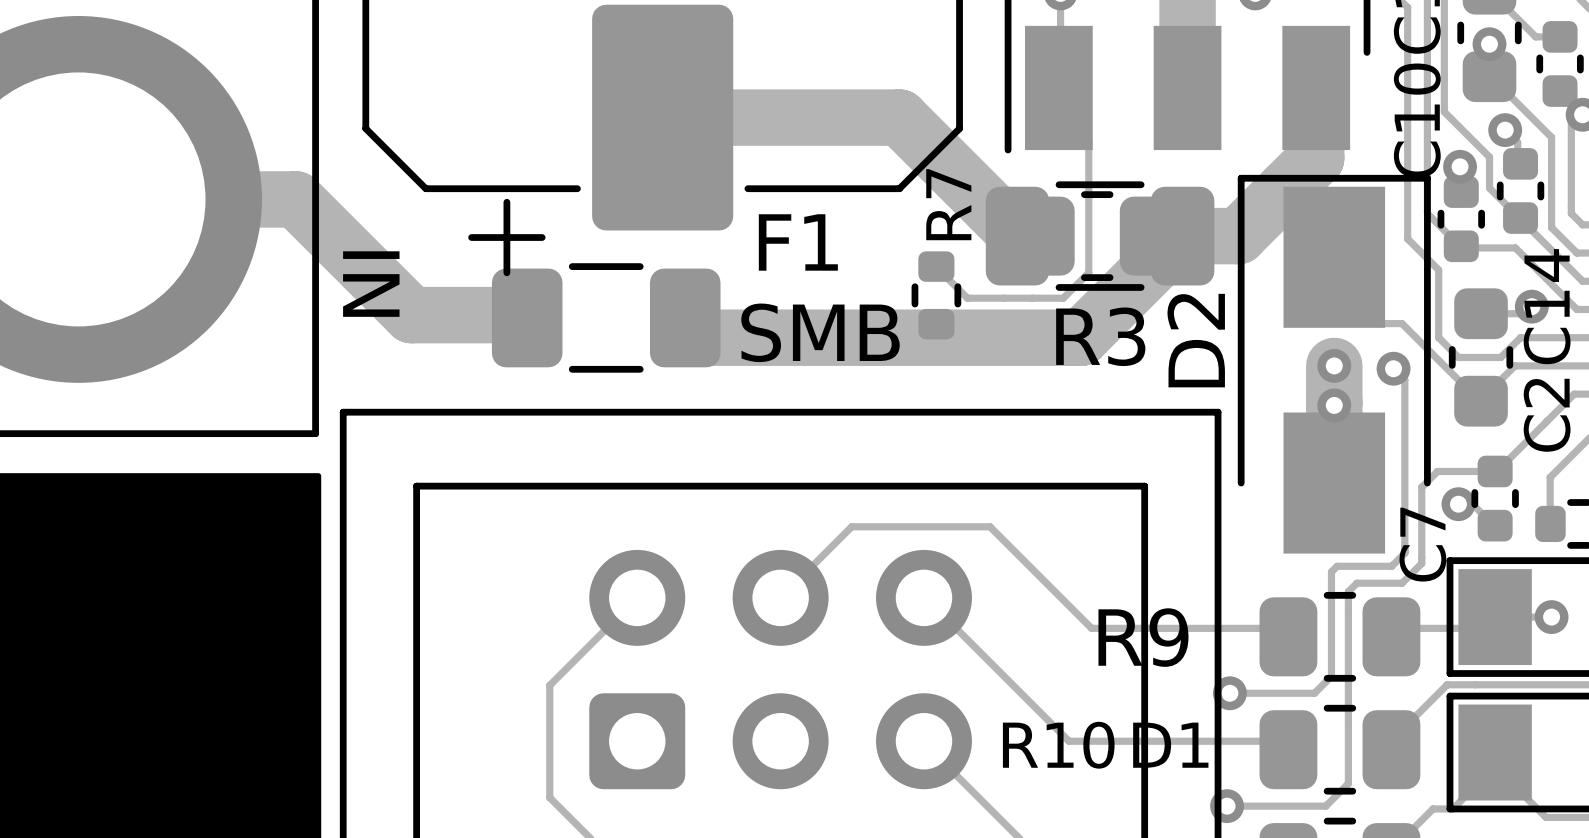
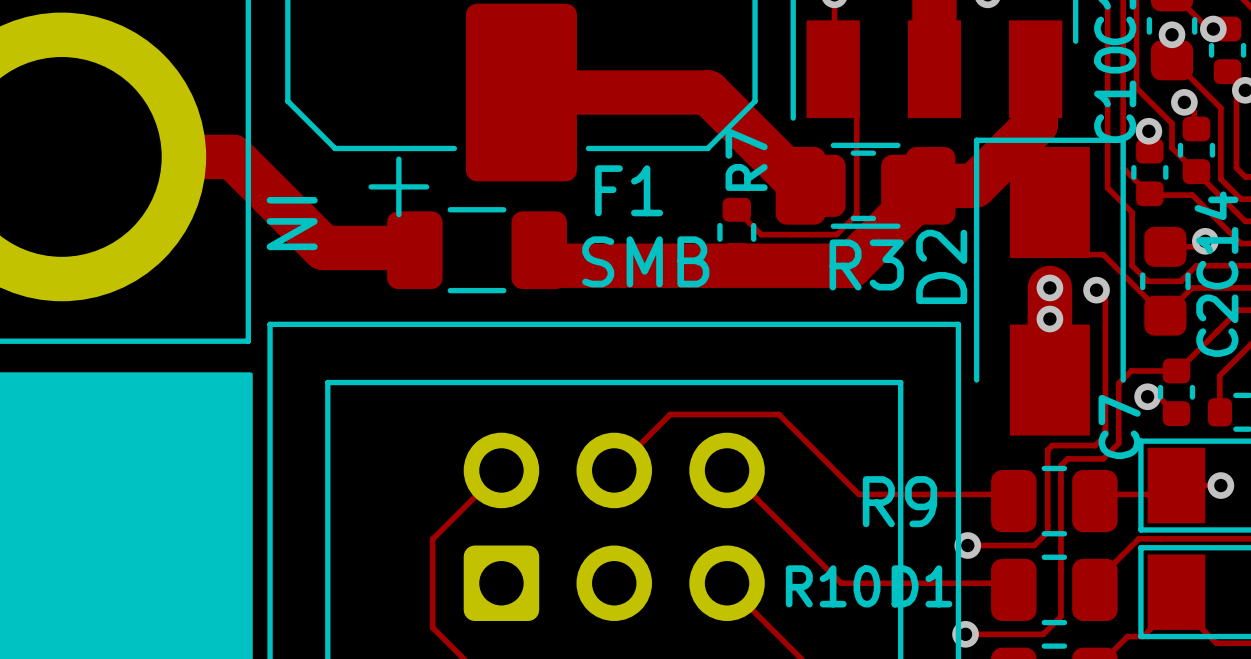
via: none -> (1213, 29)

